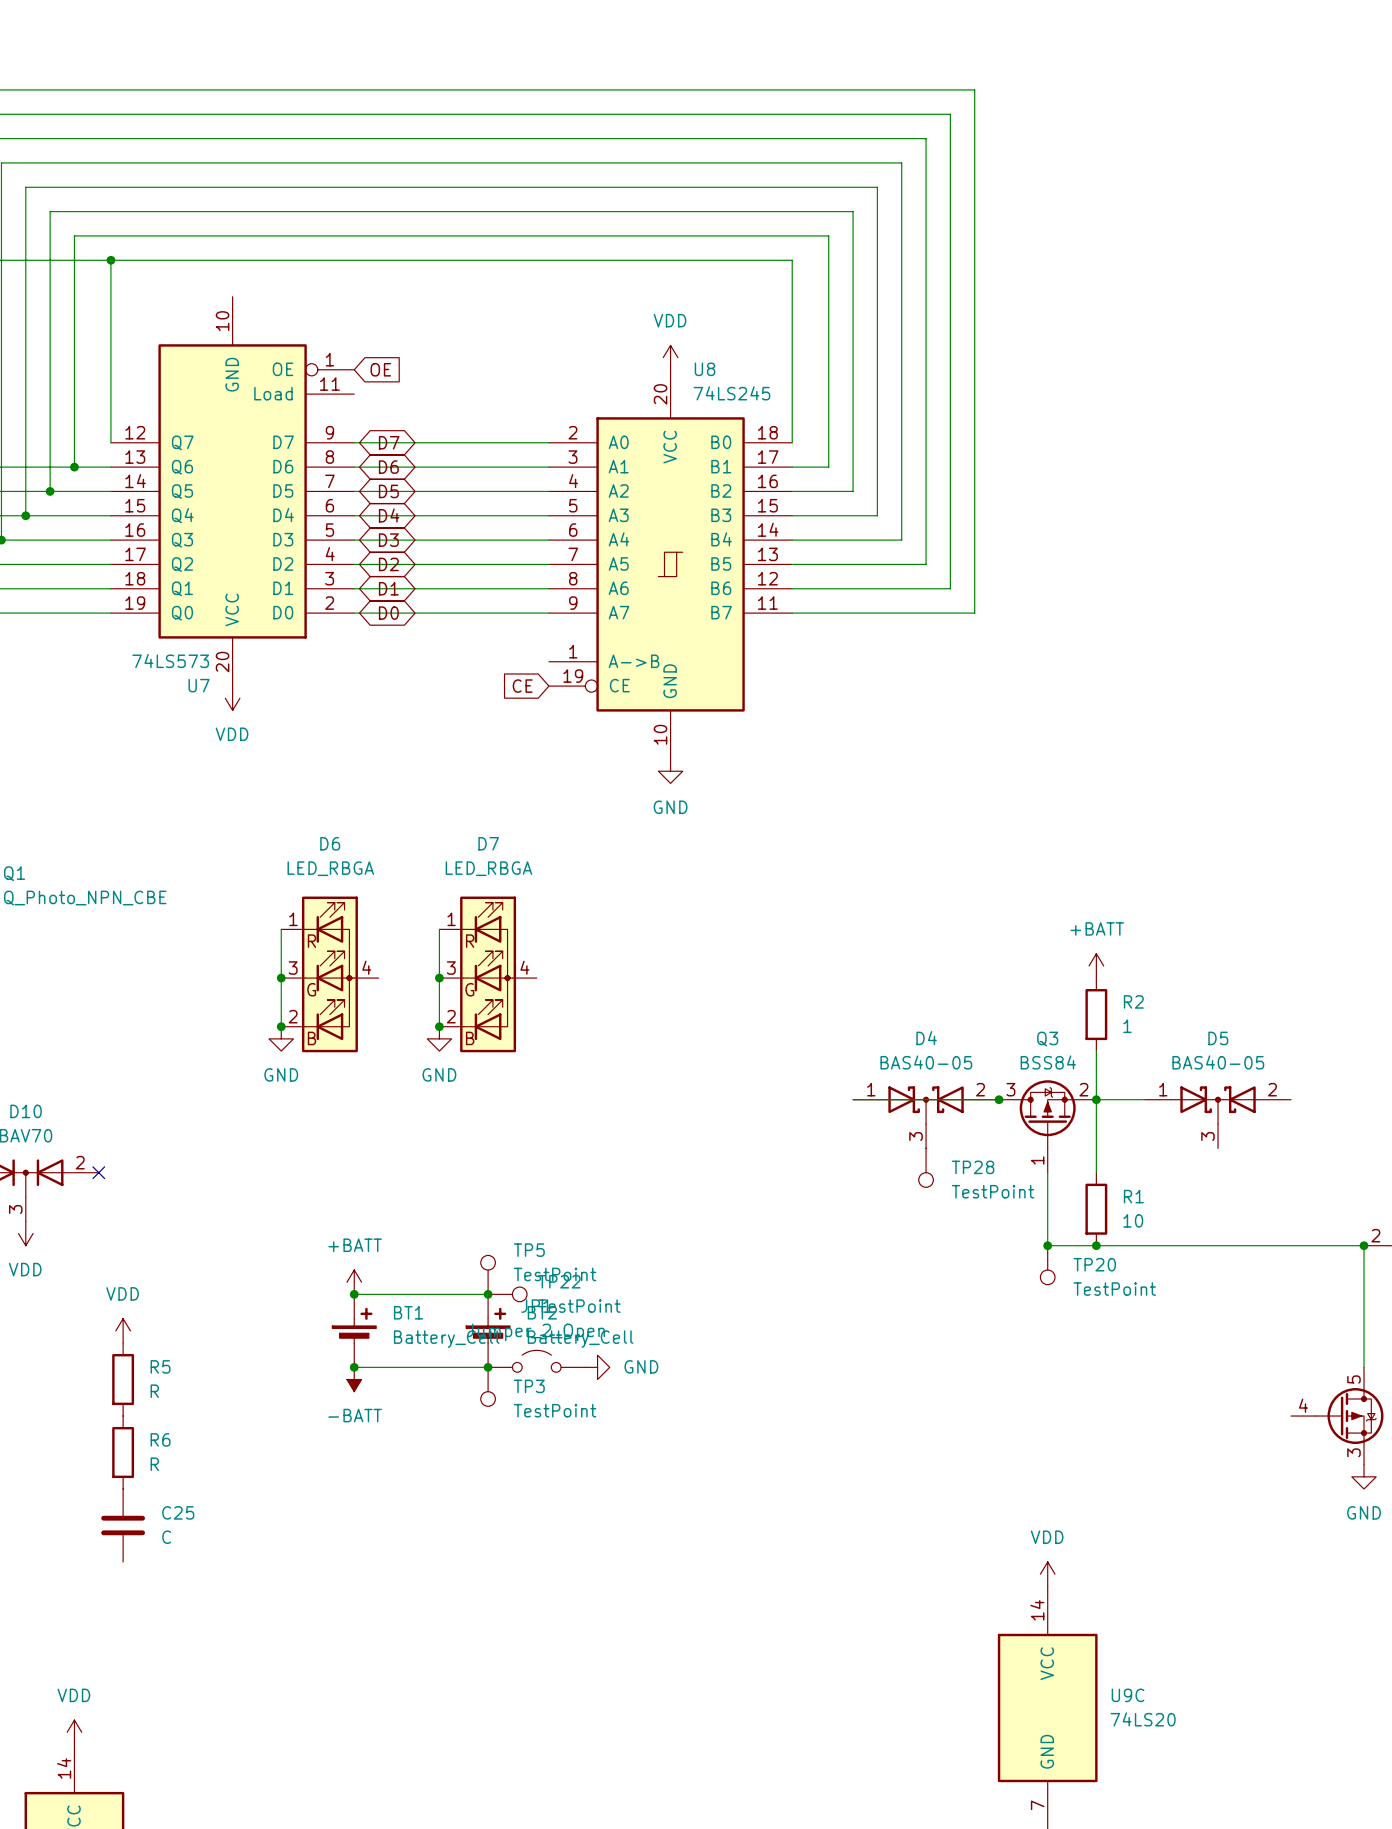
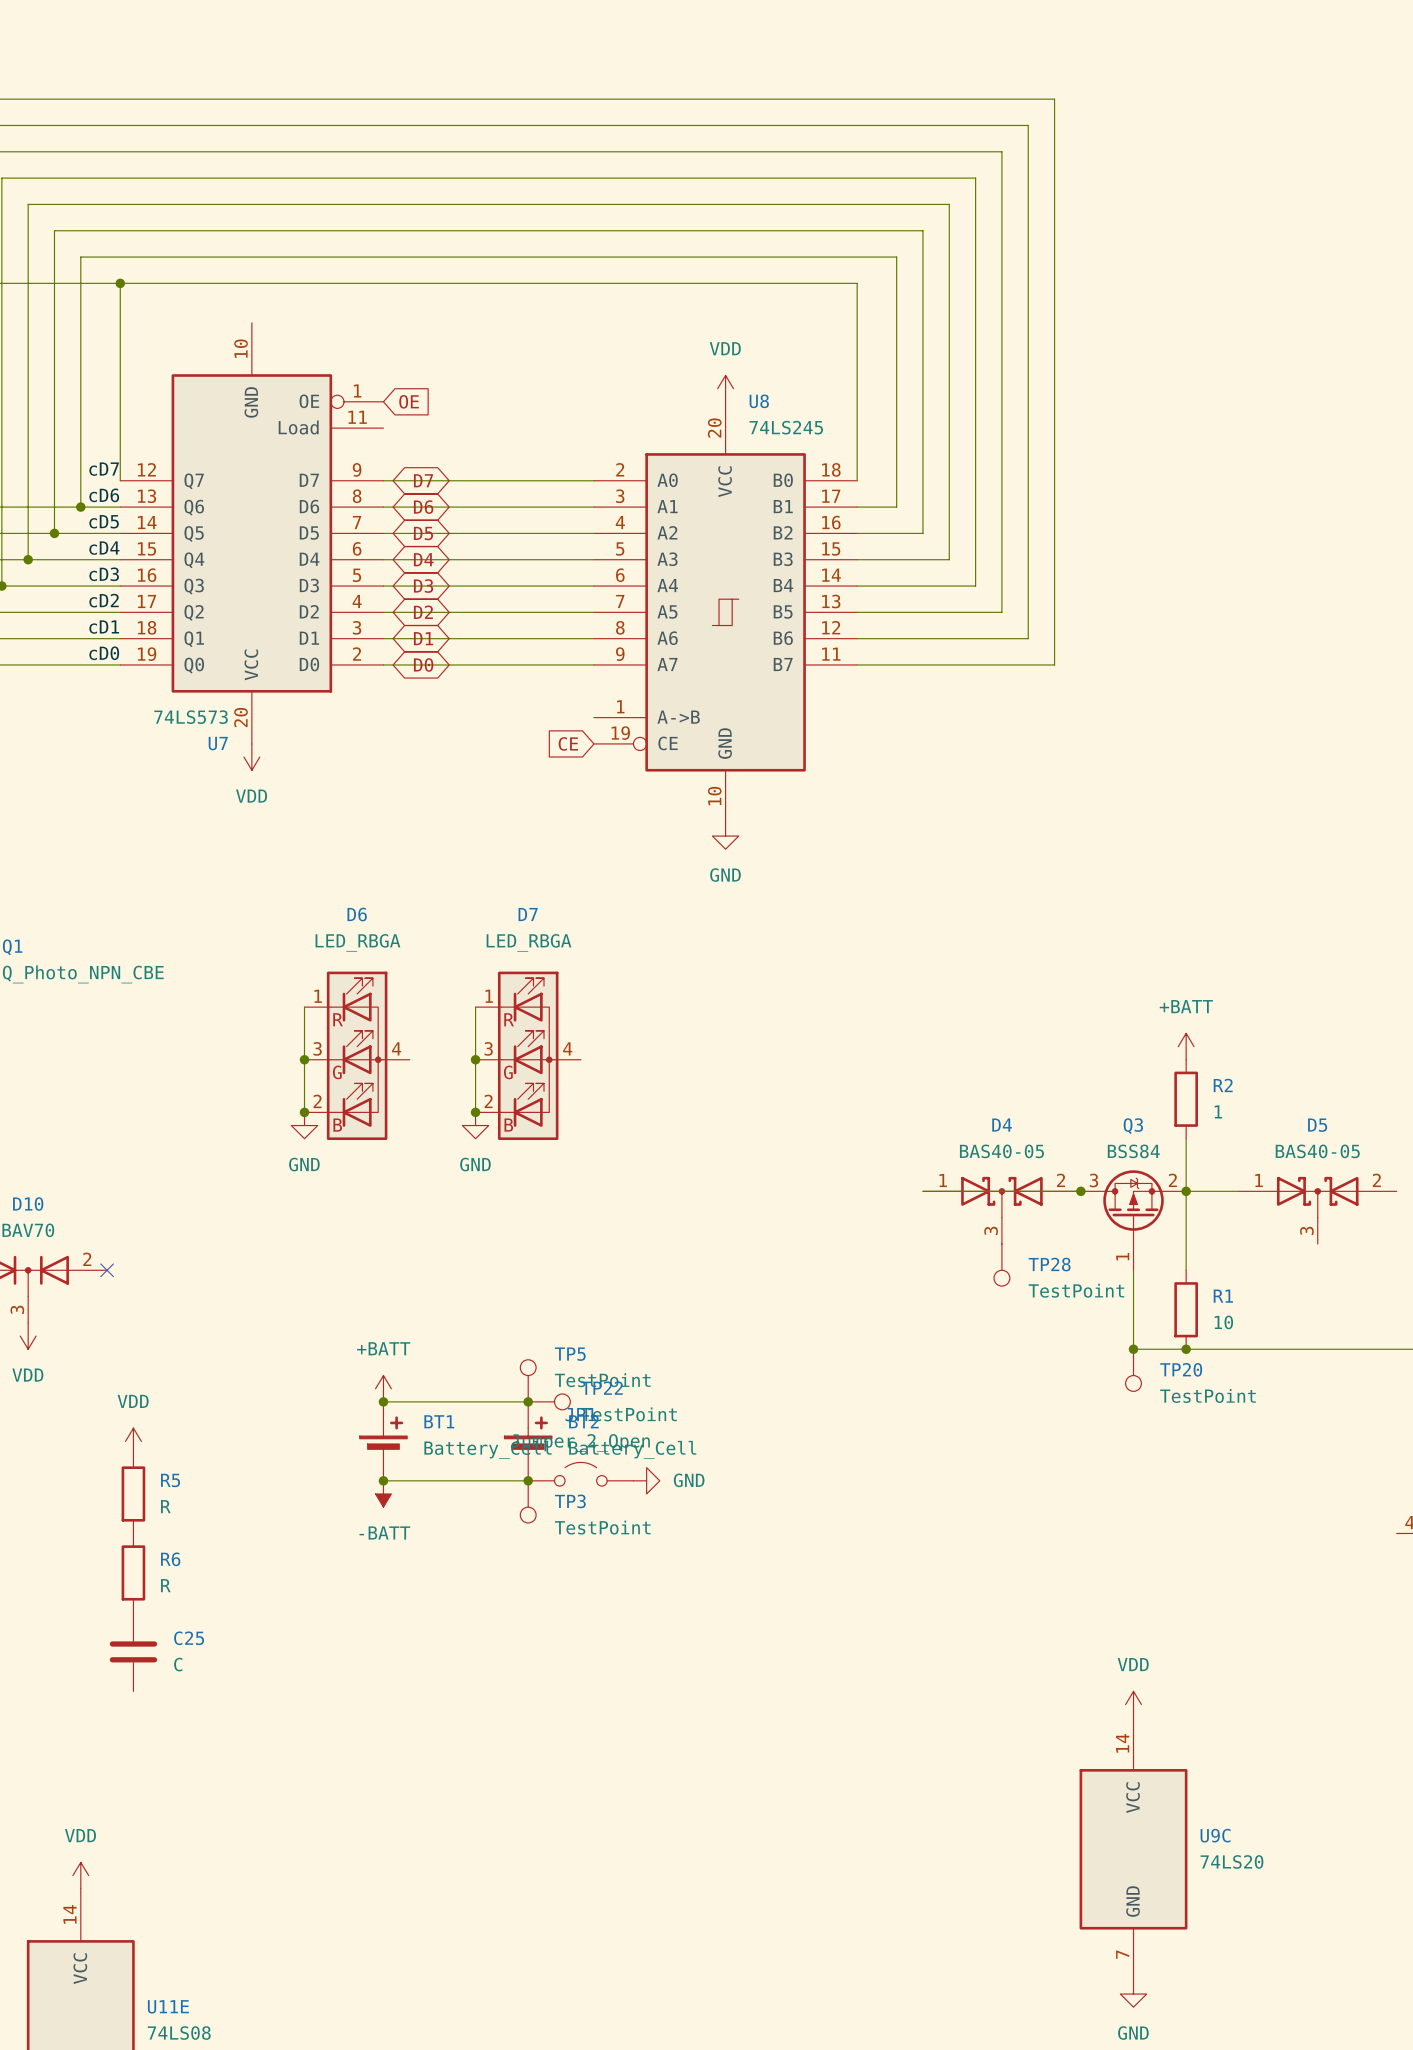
label: none -> cD7 (104, 469)
label: none -> cD6 (104, 495)
label: none -> cD5 (104, 521)
label: none -> cD4 (104, 548)
label: none -> cD3 (104, 574)
label: none -> cD2 (104, 600)
label: none -> cD1 (104, 627)
label: none -> cD0 (104, 653)

